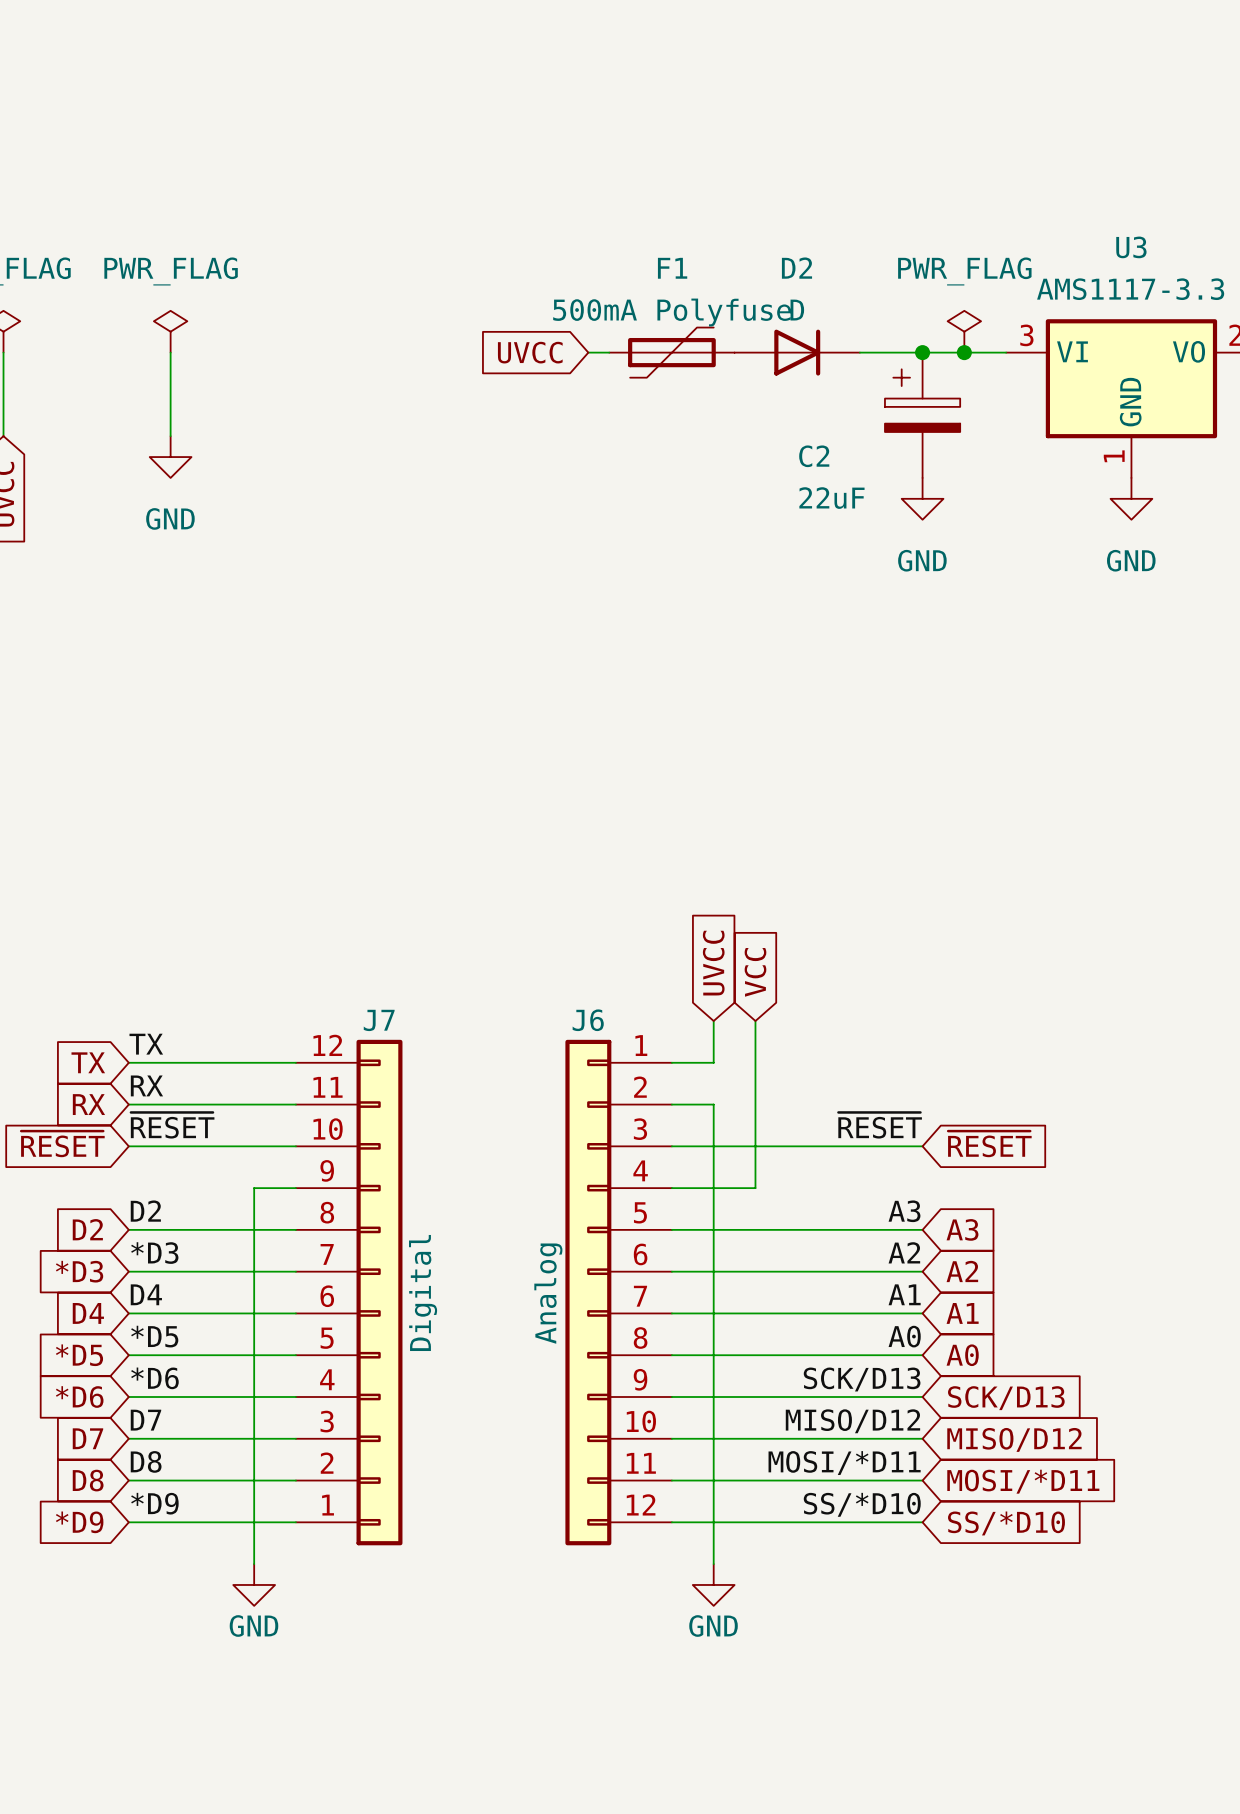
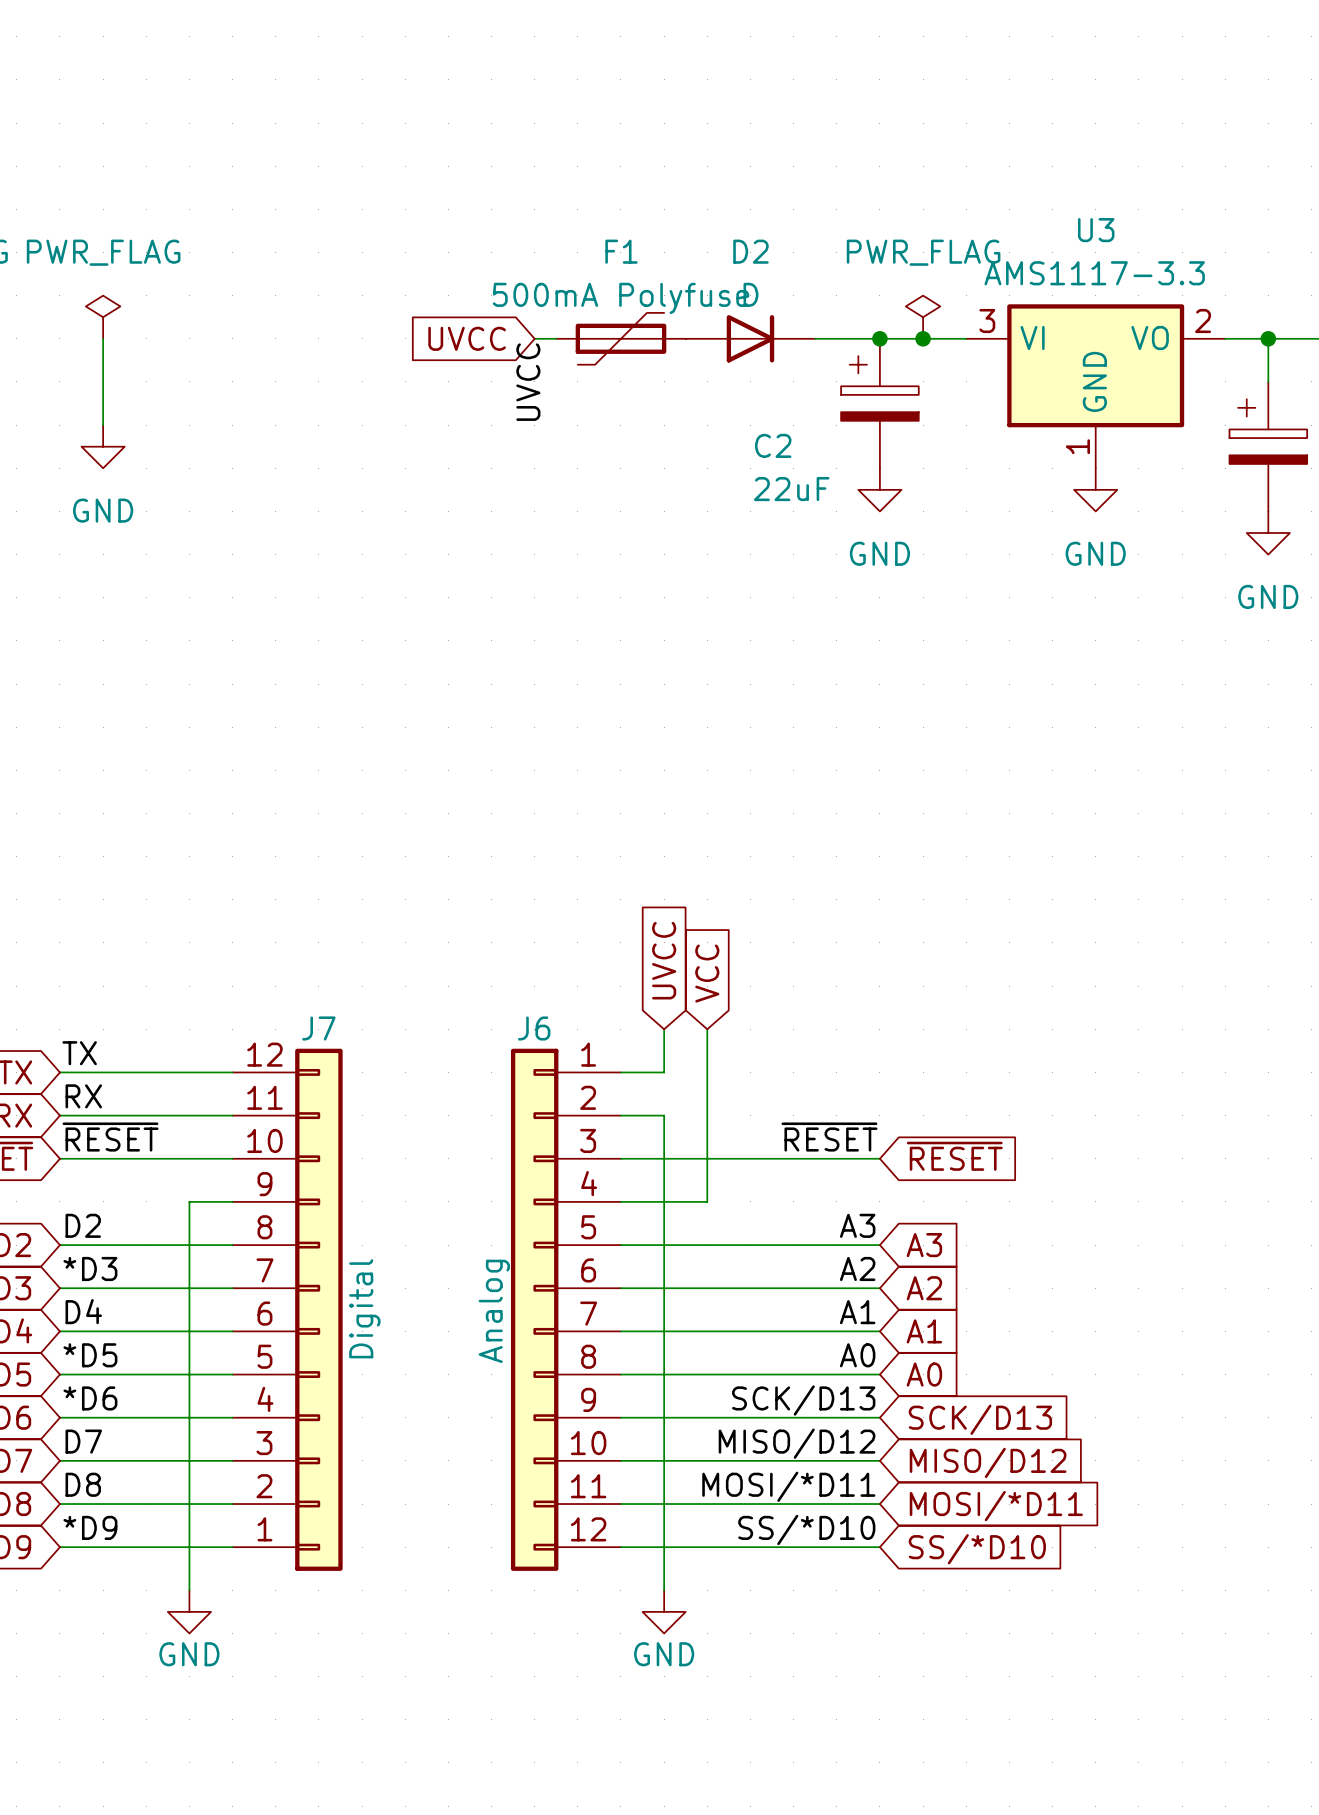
label: none -> UVCC (528, 382)

